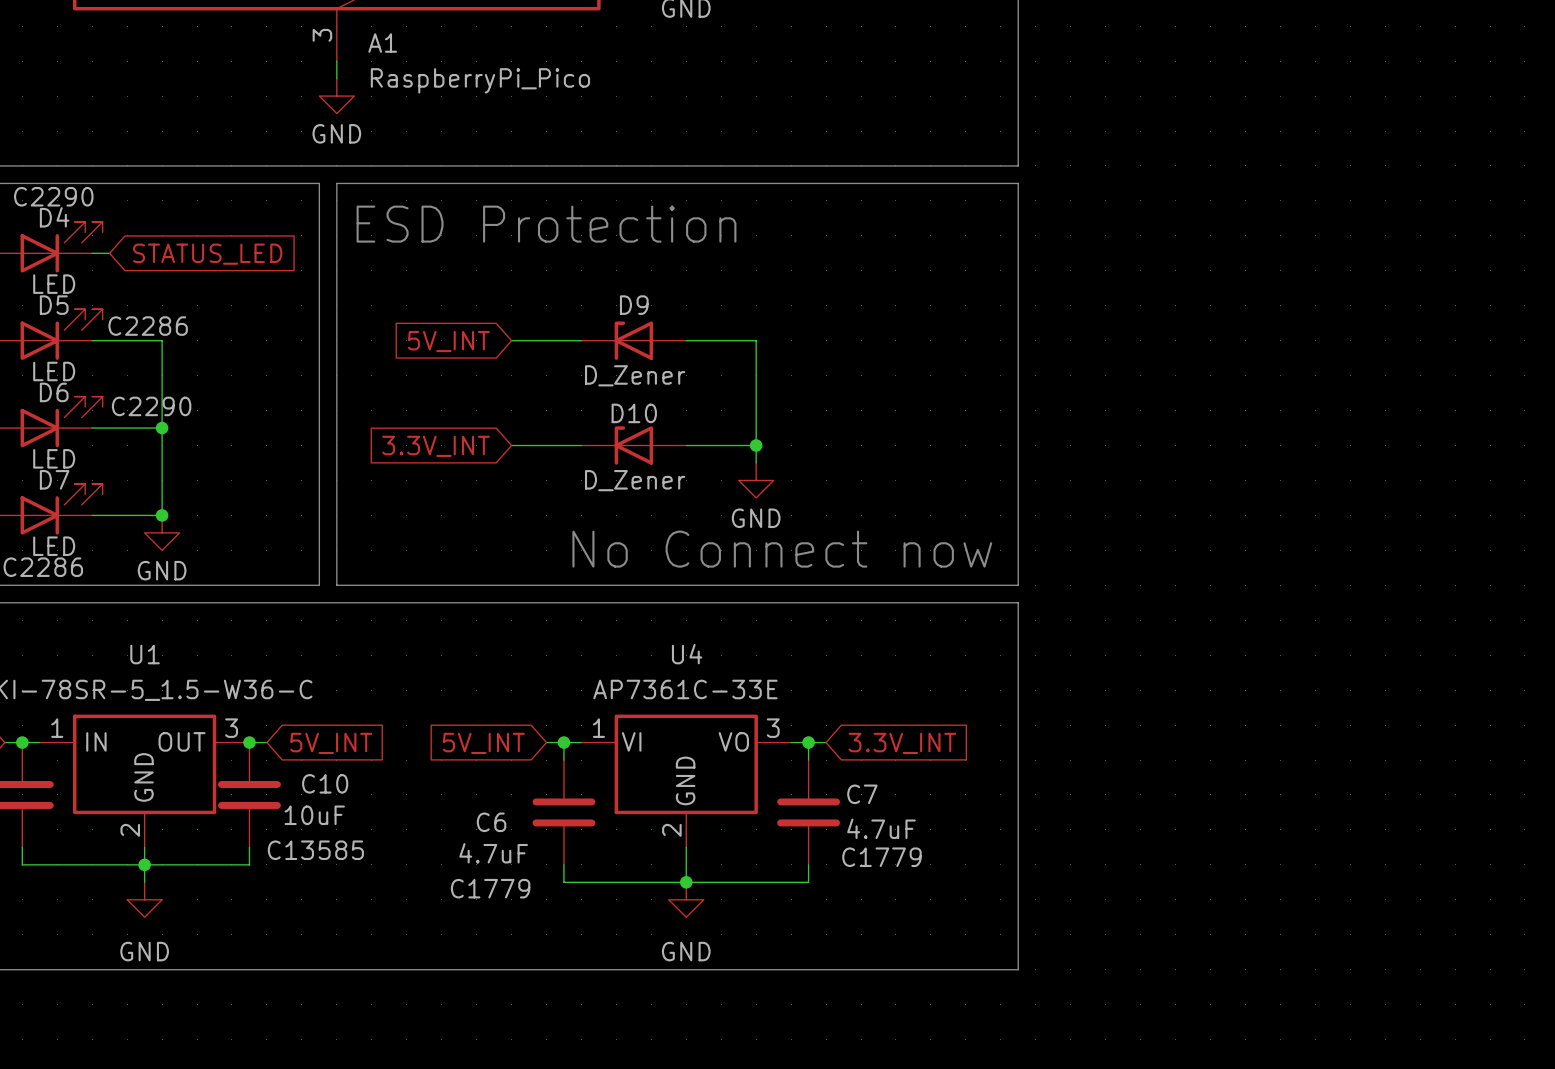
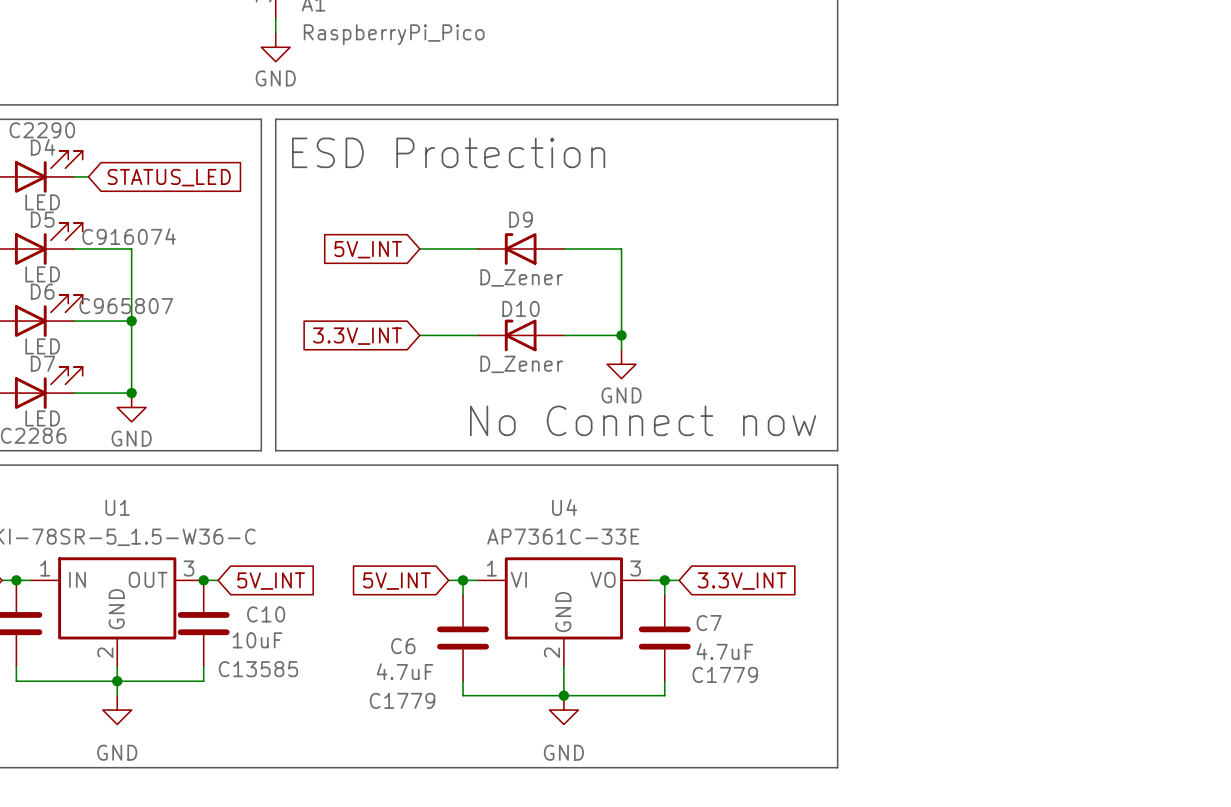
D5 text: C2286 (148, 326) -> C916074 (129, 236)
D6 text: C2290 (151, 406) -> C965807 (126, 306)

